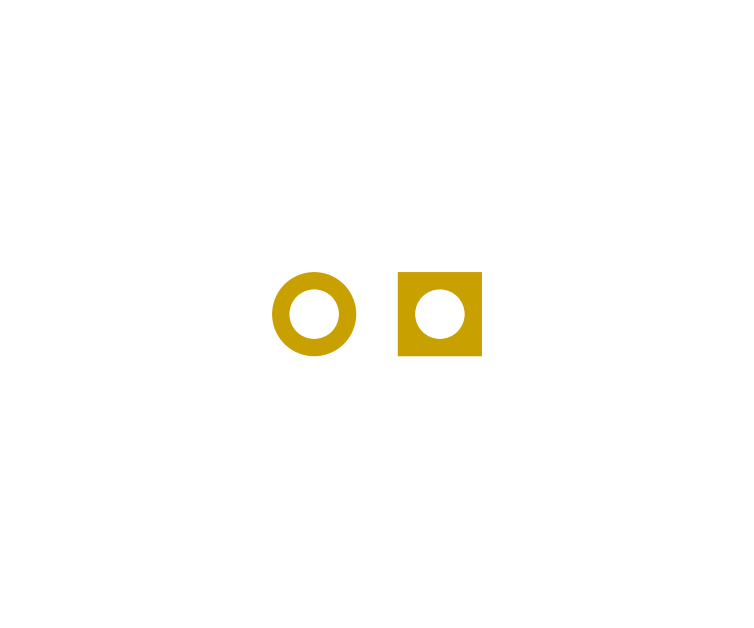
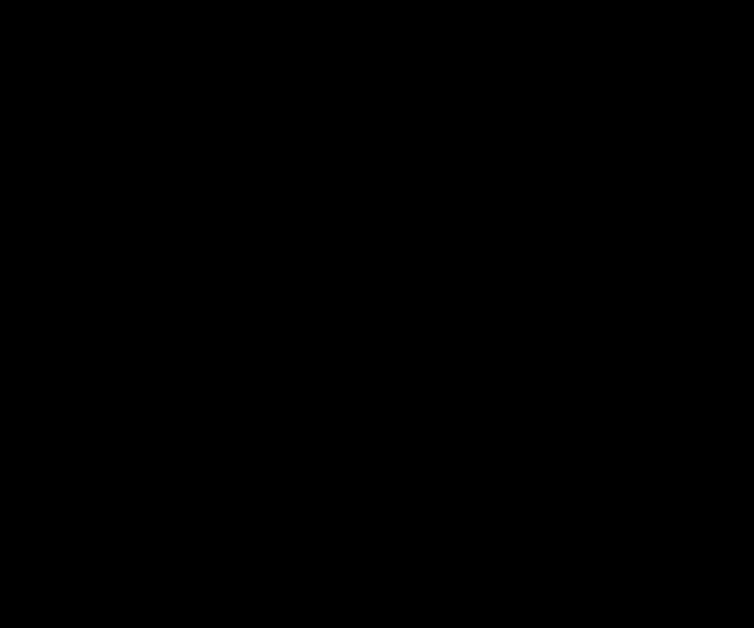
part: (377, 314) -> none

